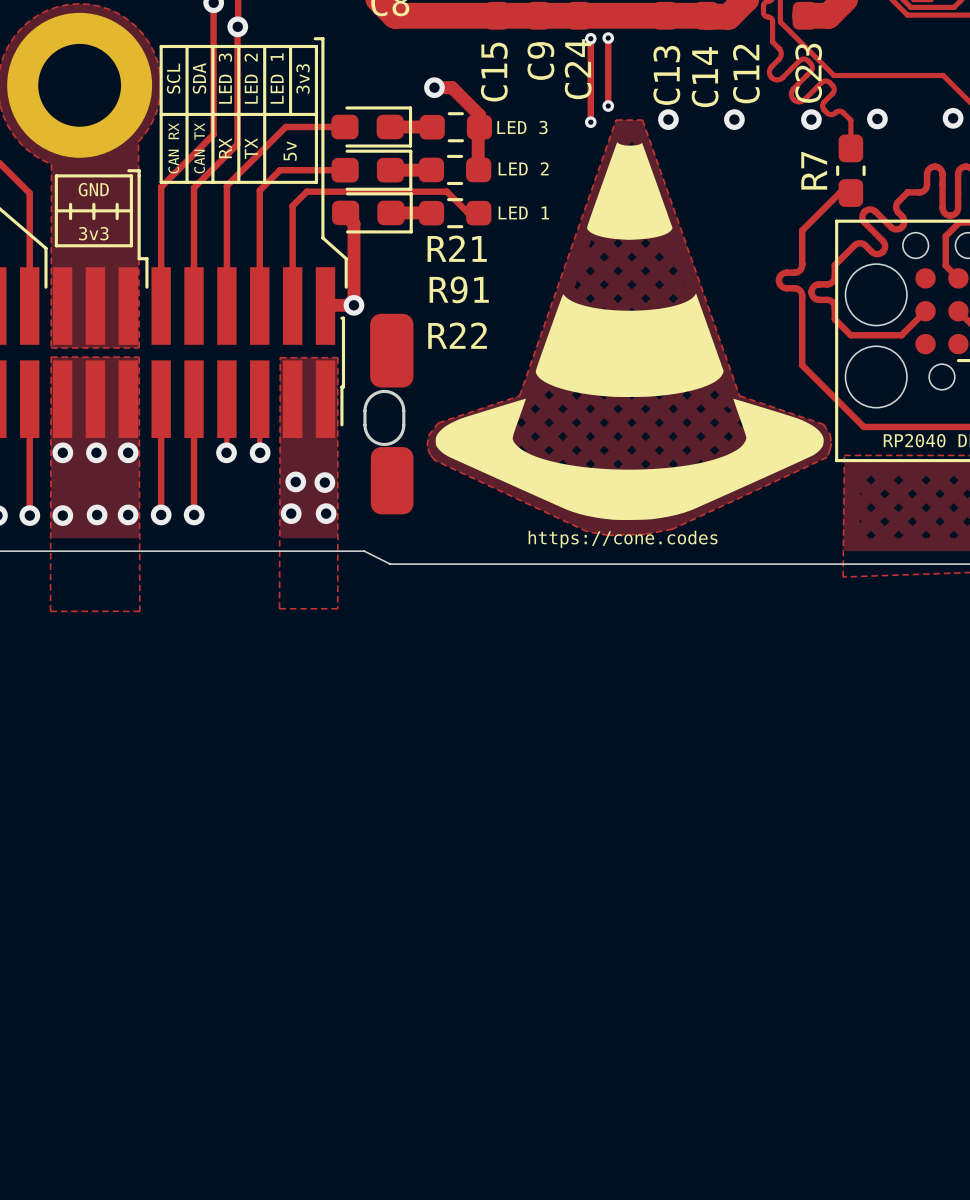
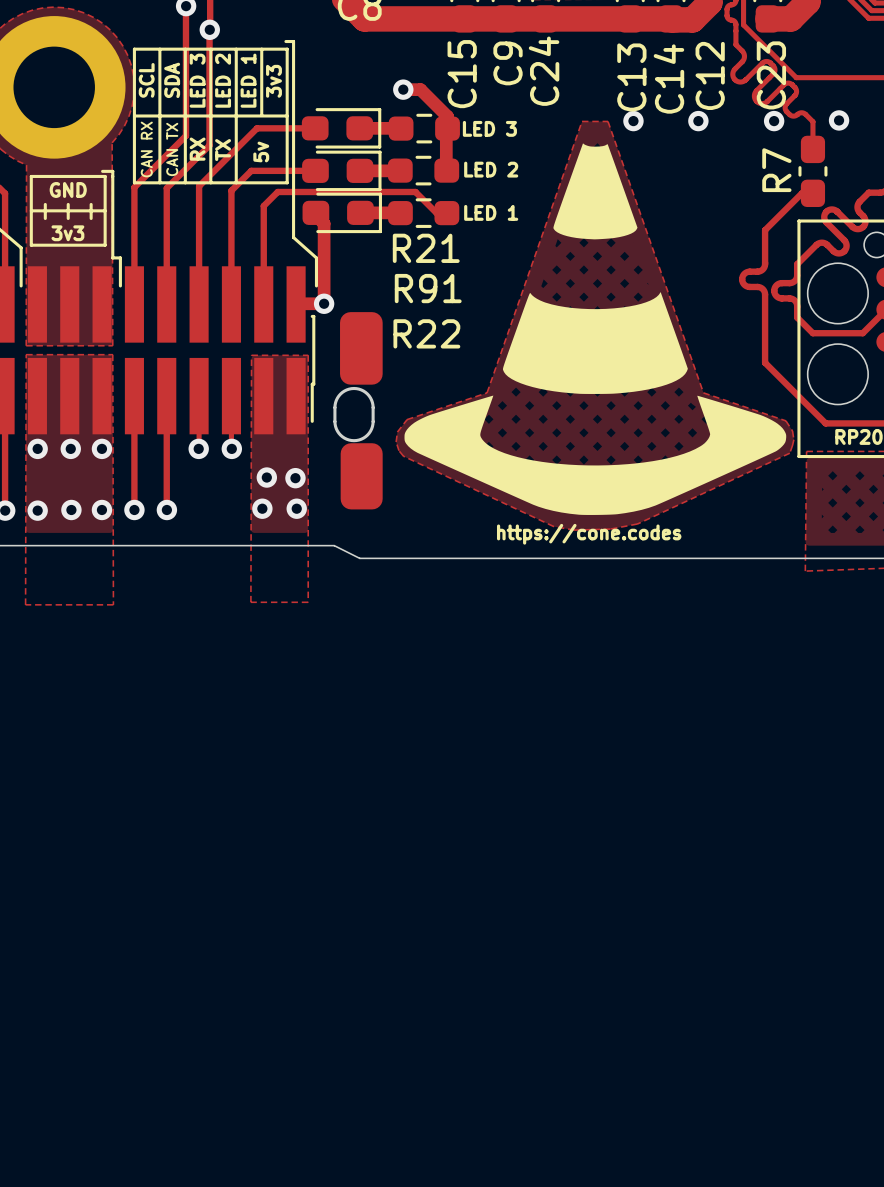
track: (590, 38) (590, 122) -> none
via: (590, 38) -> none
track: (608, 38) (608, 106) -> none
via: (608, 38) -> none
via: (608, 106) -> none
via: (590, 122) -> none

